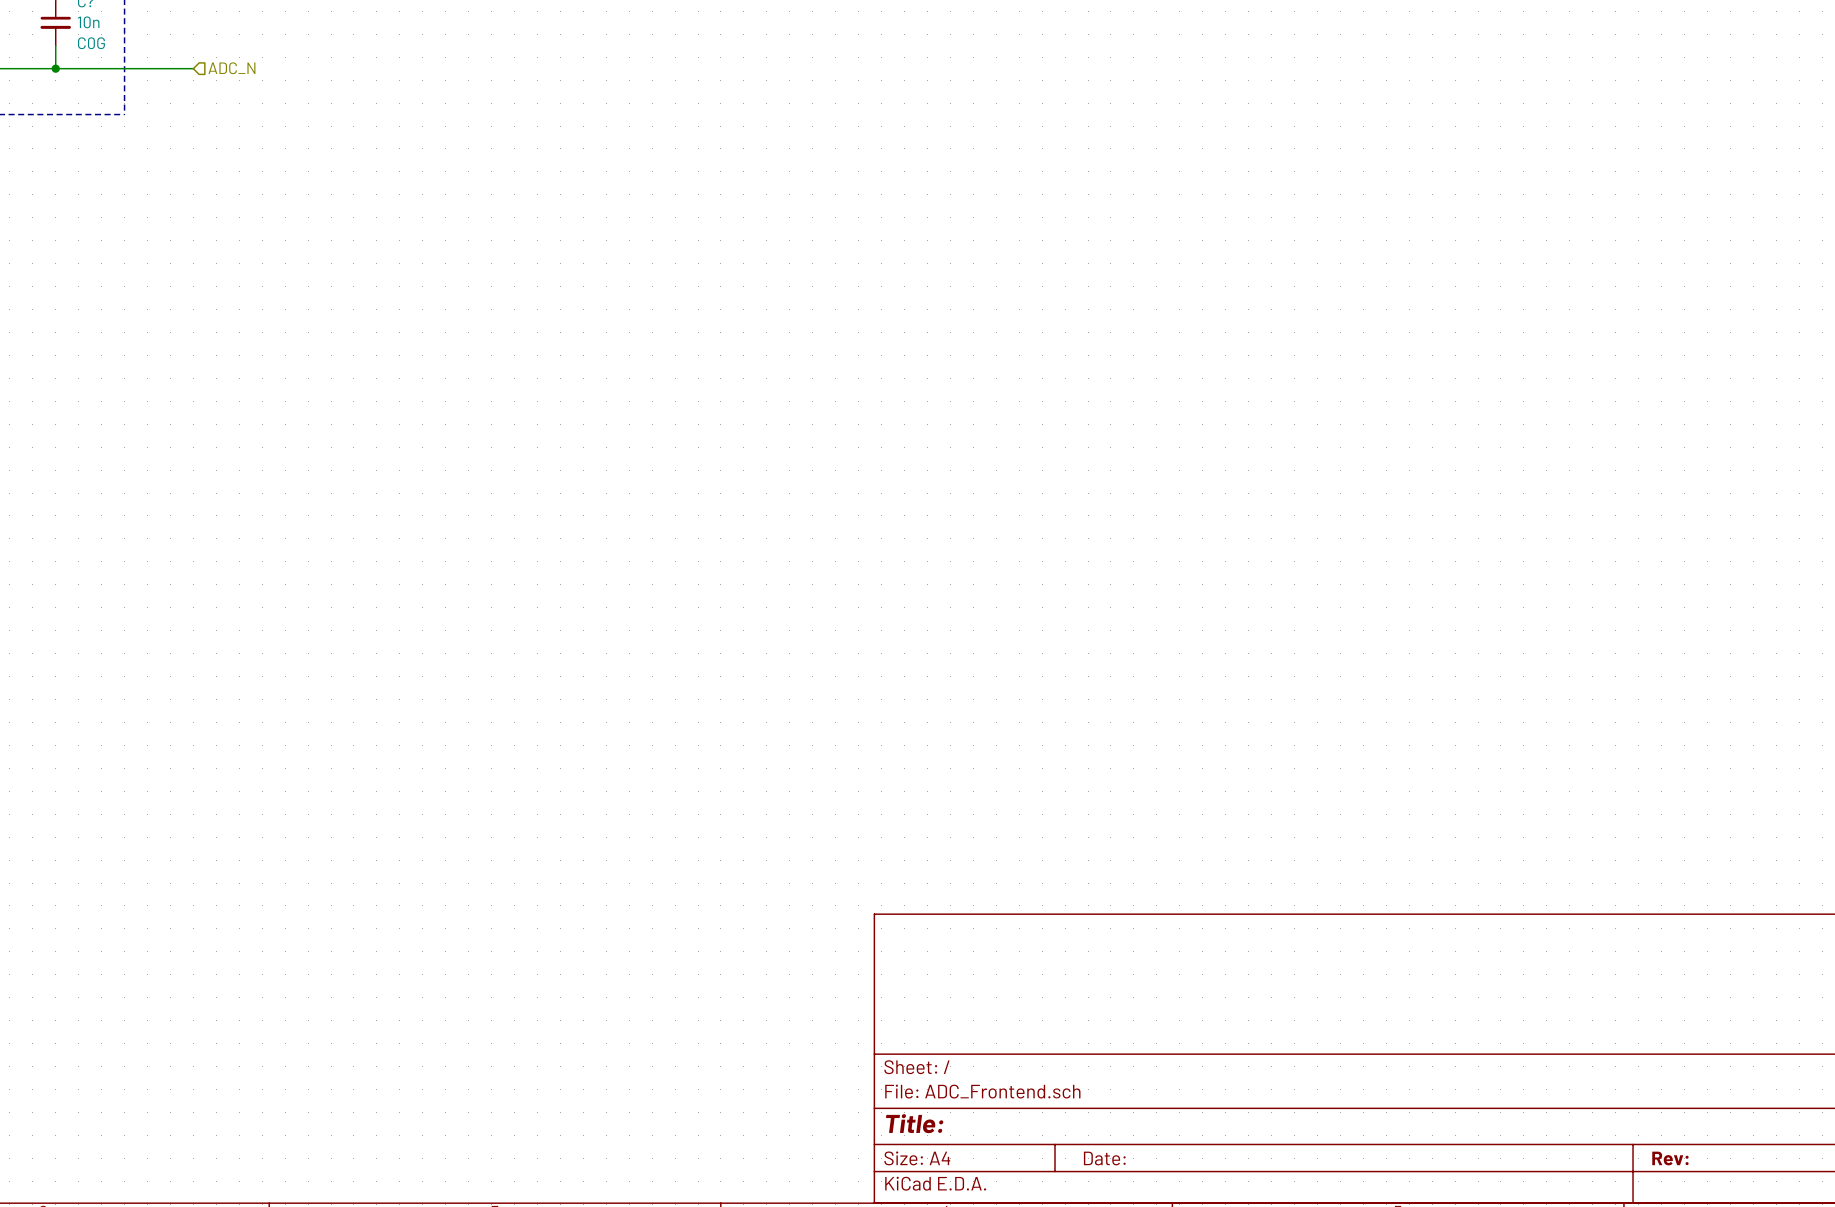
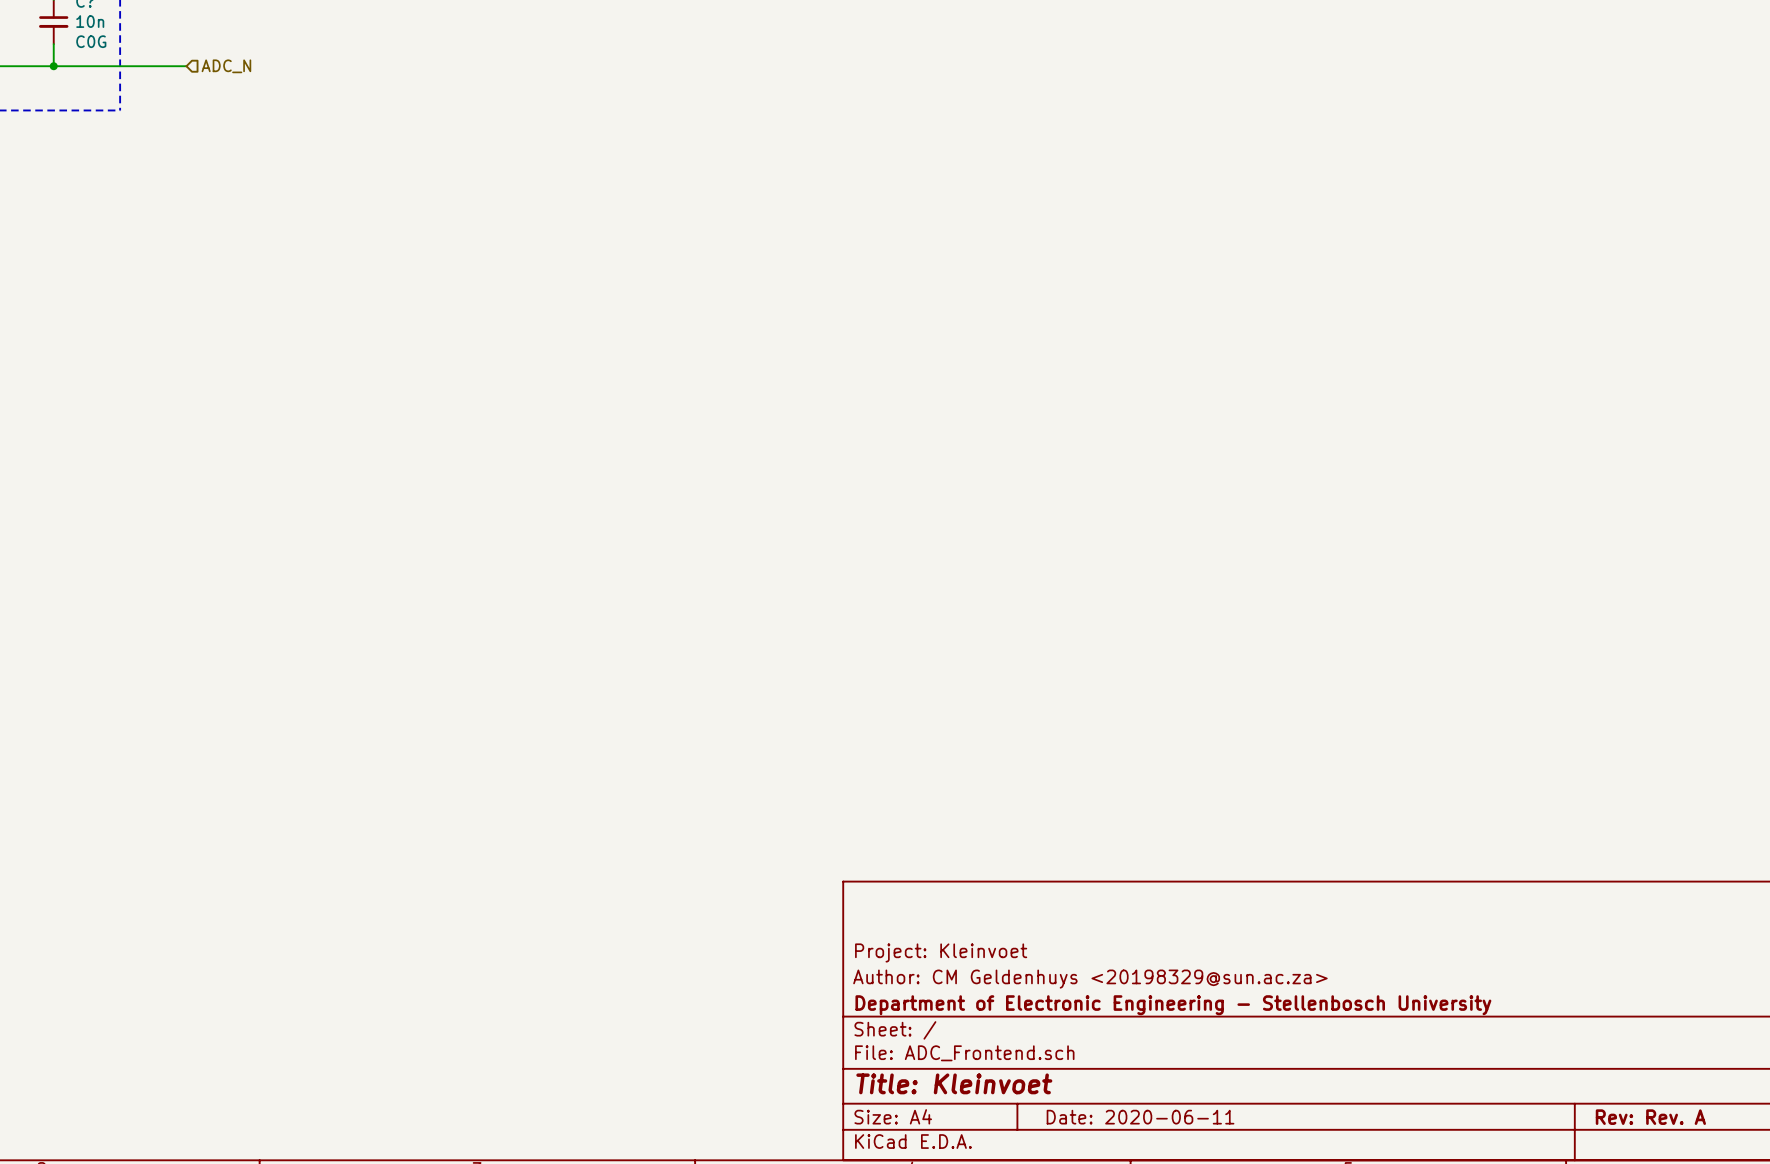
title block: none -> Project: Kleinvoet (941, 952)
title block: none -> Author: CM Geldenhuys <20198329@sun.ac.za> (1090, 979)
title block: none -> Department of Electronic Engineering - Stellenbosch University (1173, 1005)
title block: Title: (914, 1123) -> Title: Kleinvoet (954, 1083)
title block: Date: (1104, 1158) -> Date: 2020-06-11 (1140, 1117)
title block: Rev: (1670, 1158) -> Rev: Rev. A (1650, 1117)

